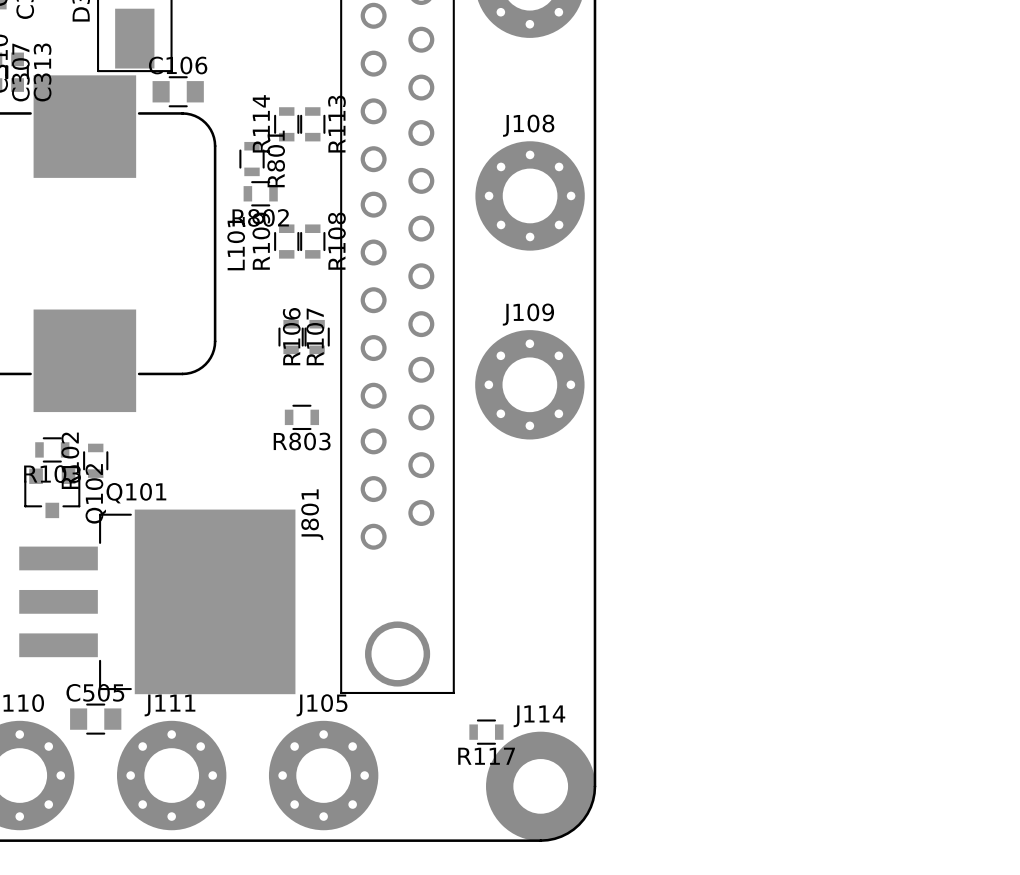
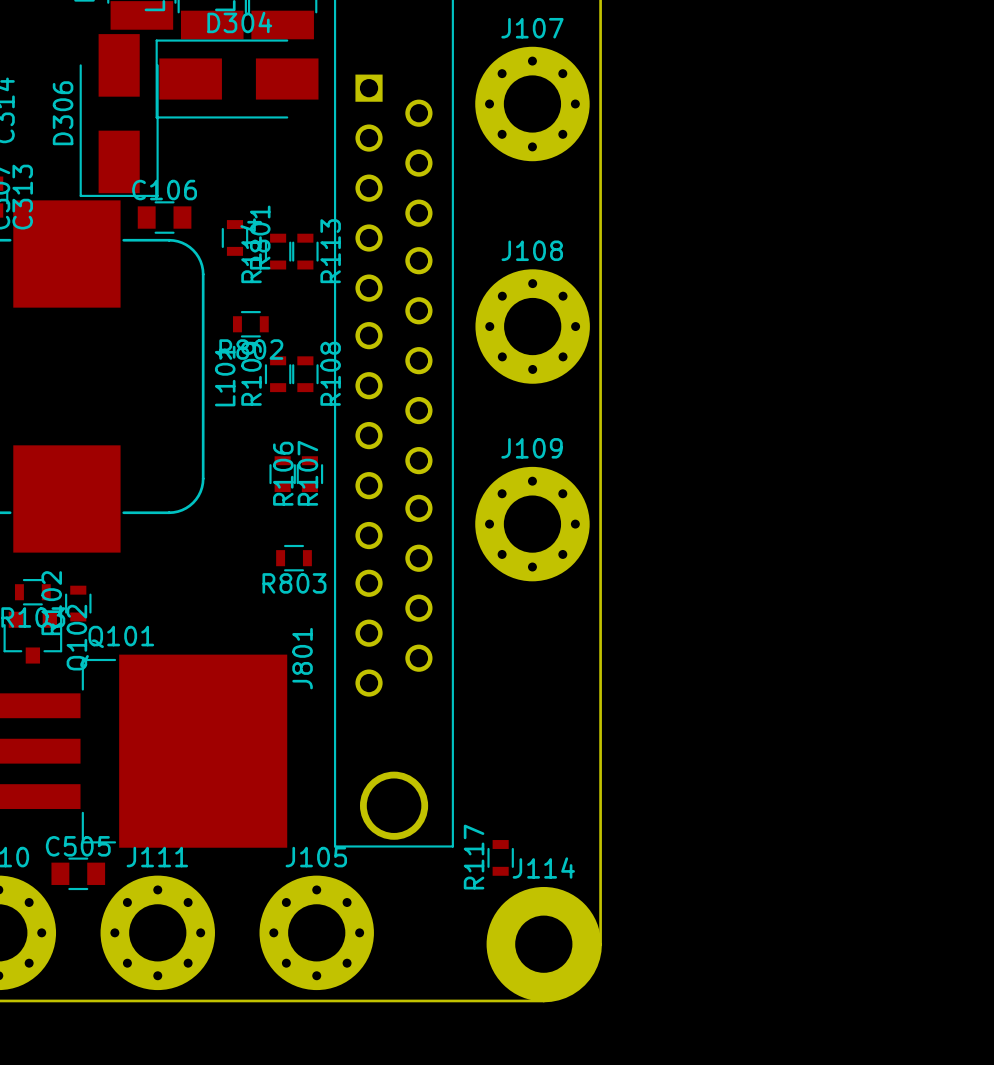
R801 position: (252, 159) -> (234, 237)
R117 rotation: 0° (486, 732) -> 90° clockwise (500, 857)
R117 position: (486, 732) -> (500, 857)

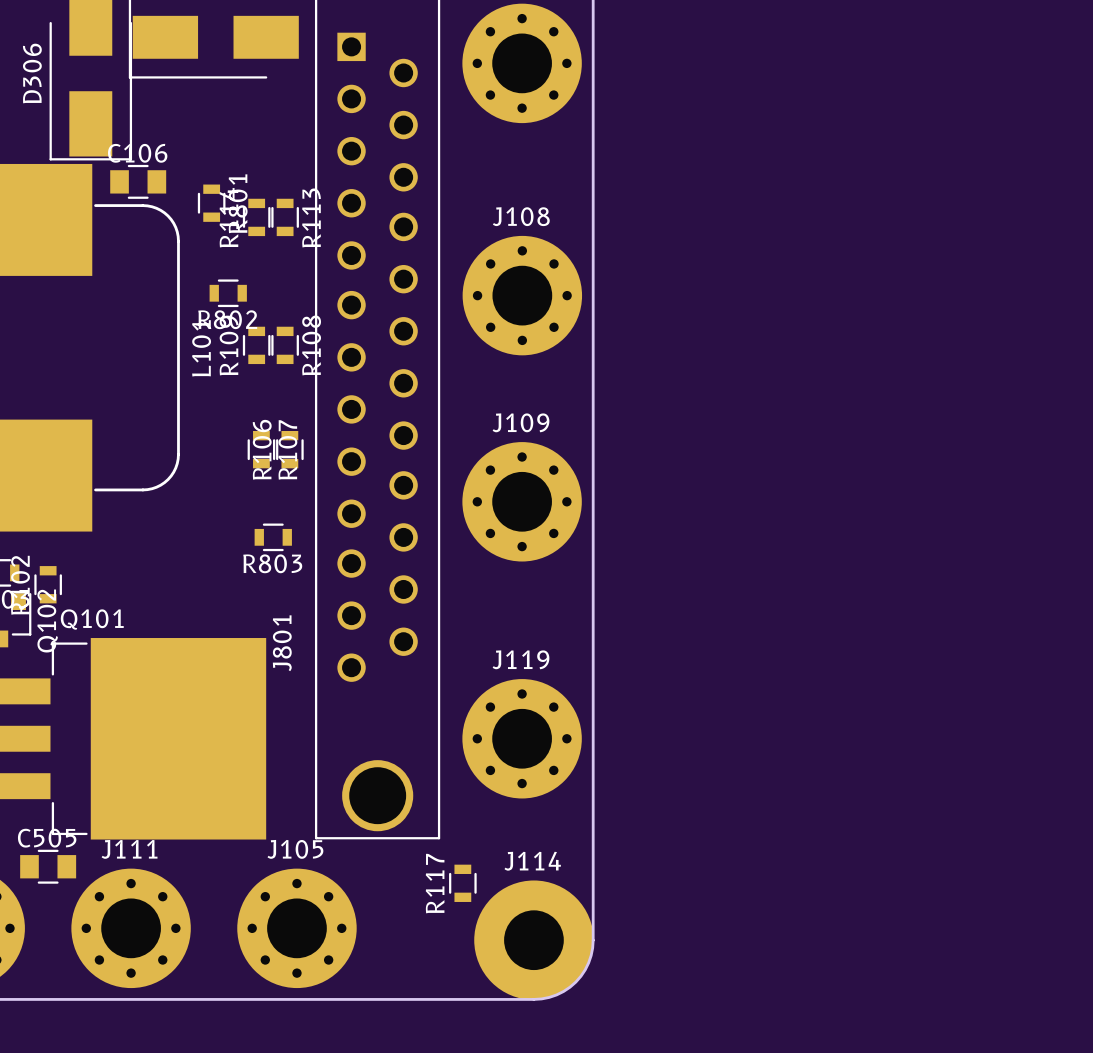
J119: none -> (522, 738)
R117 position: (500, 857) -> (462, 883)

